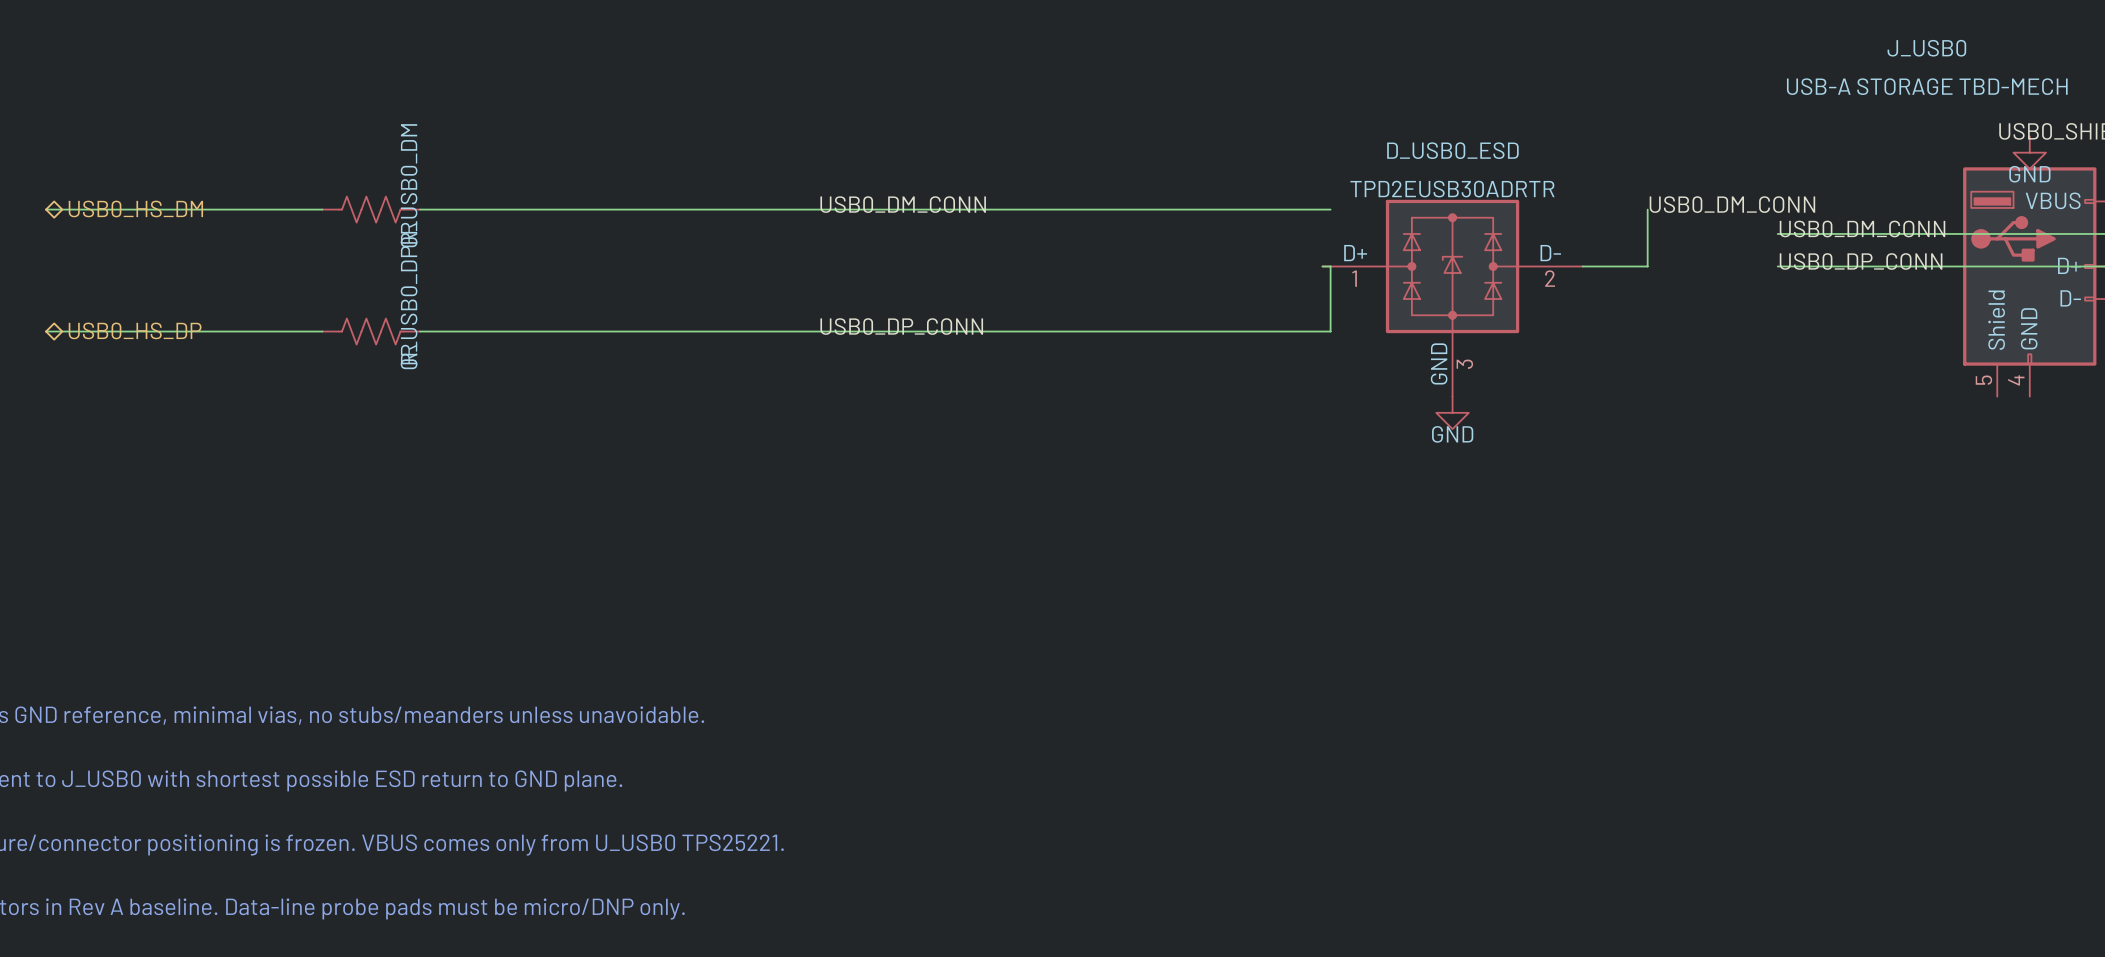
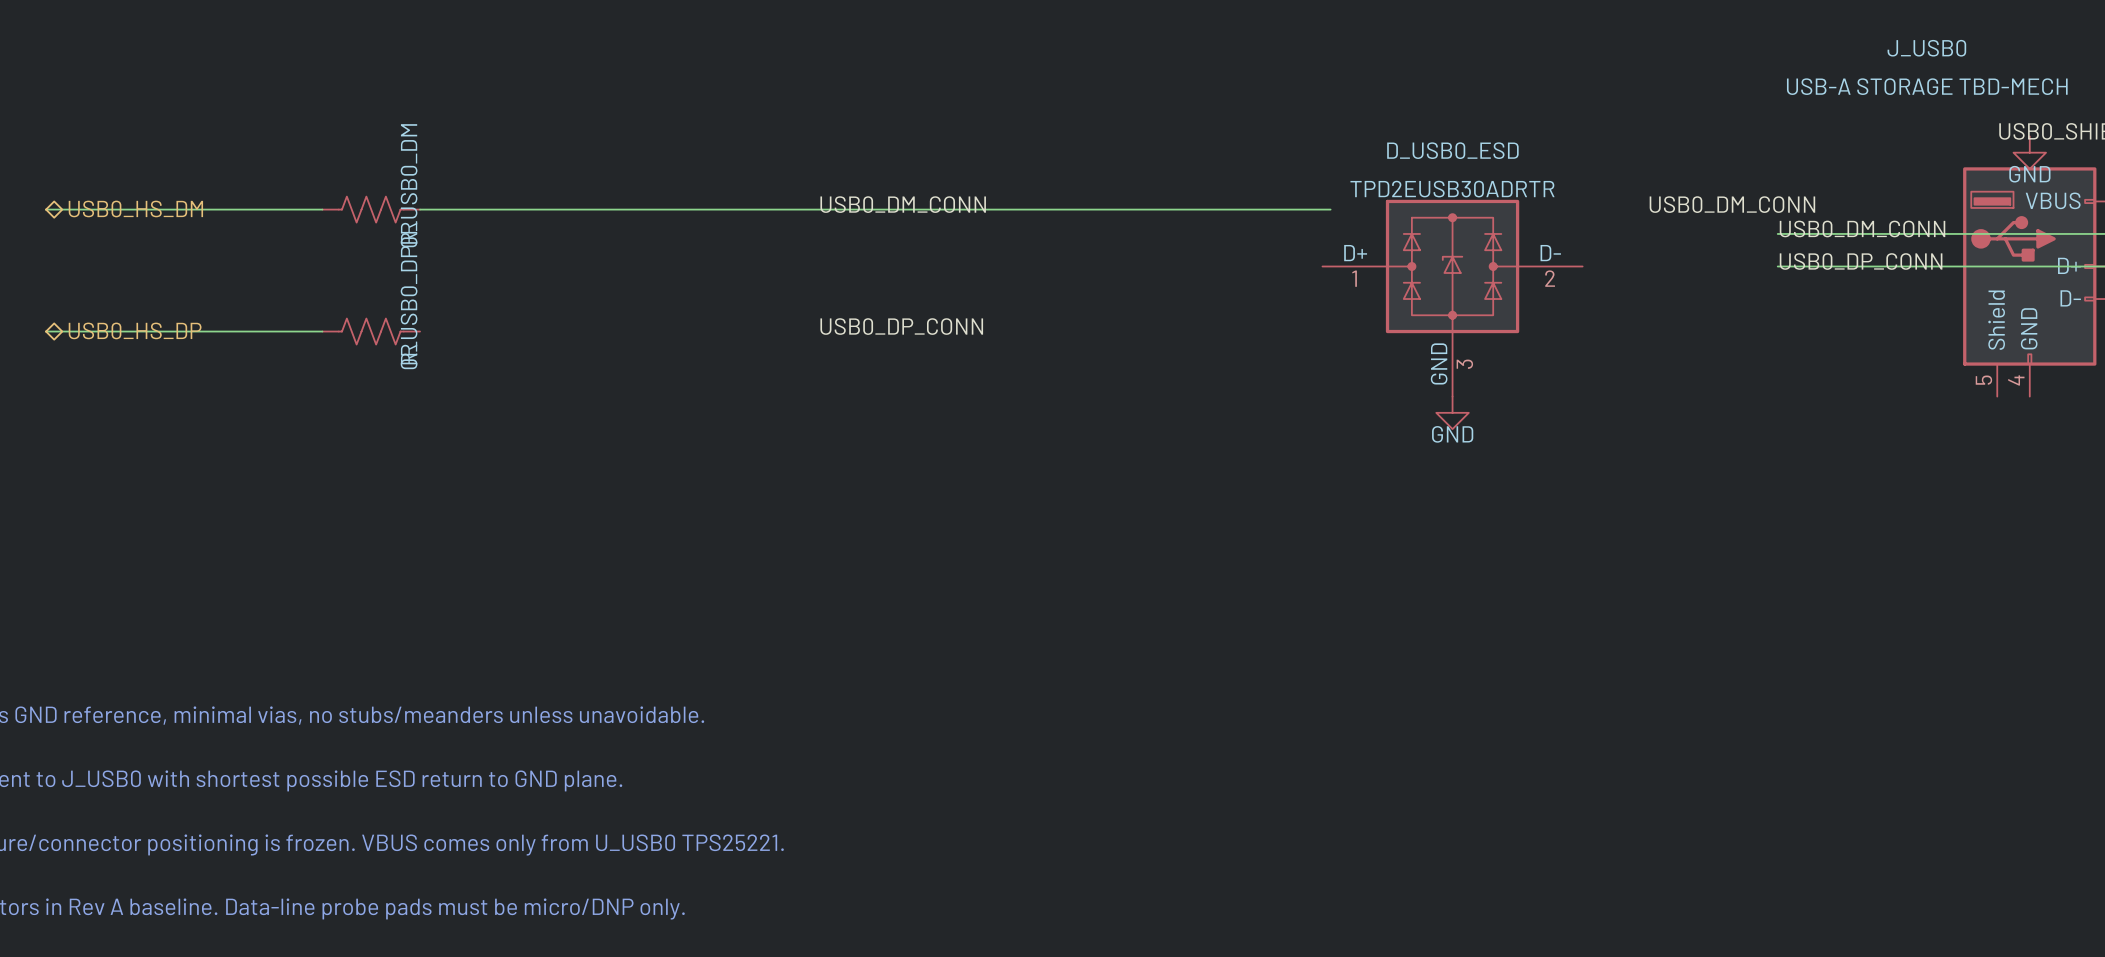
wire: (1647, 209) (1647, 266) (1582, 266) -> none
wire: (1322, 266) (1330, 266) (1330, 331) (420, 331) -> none

